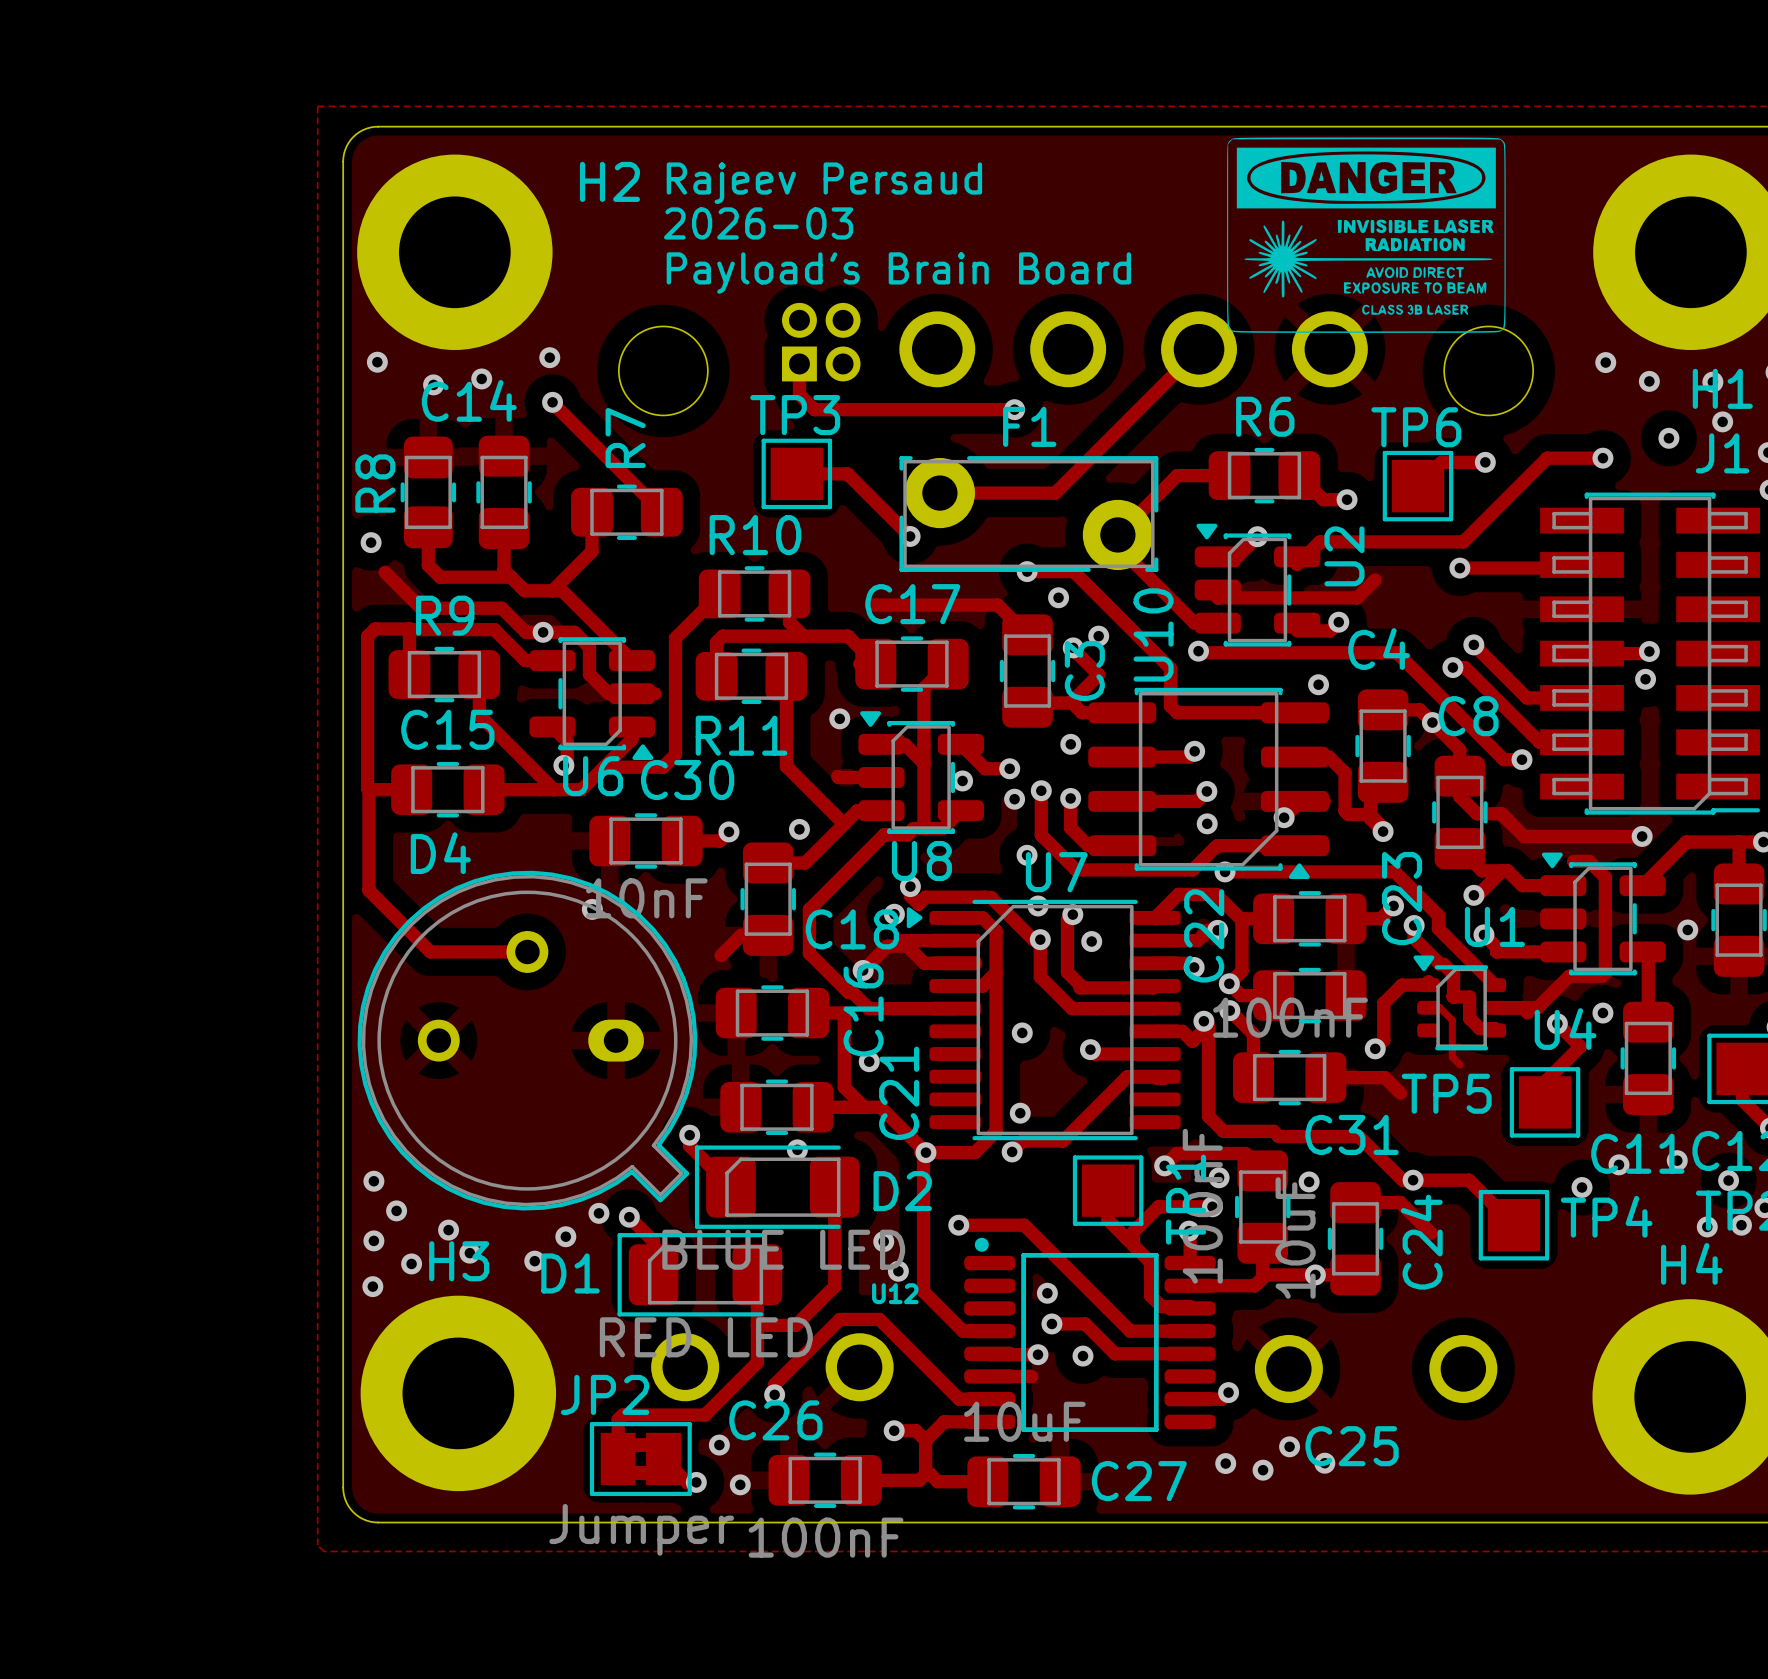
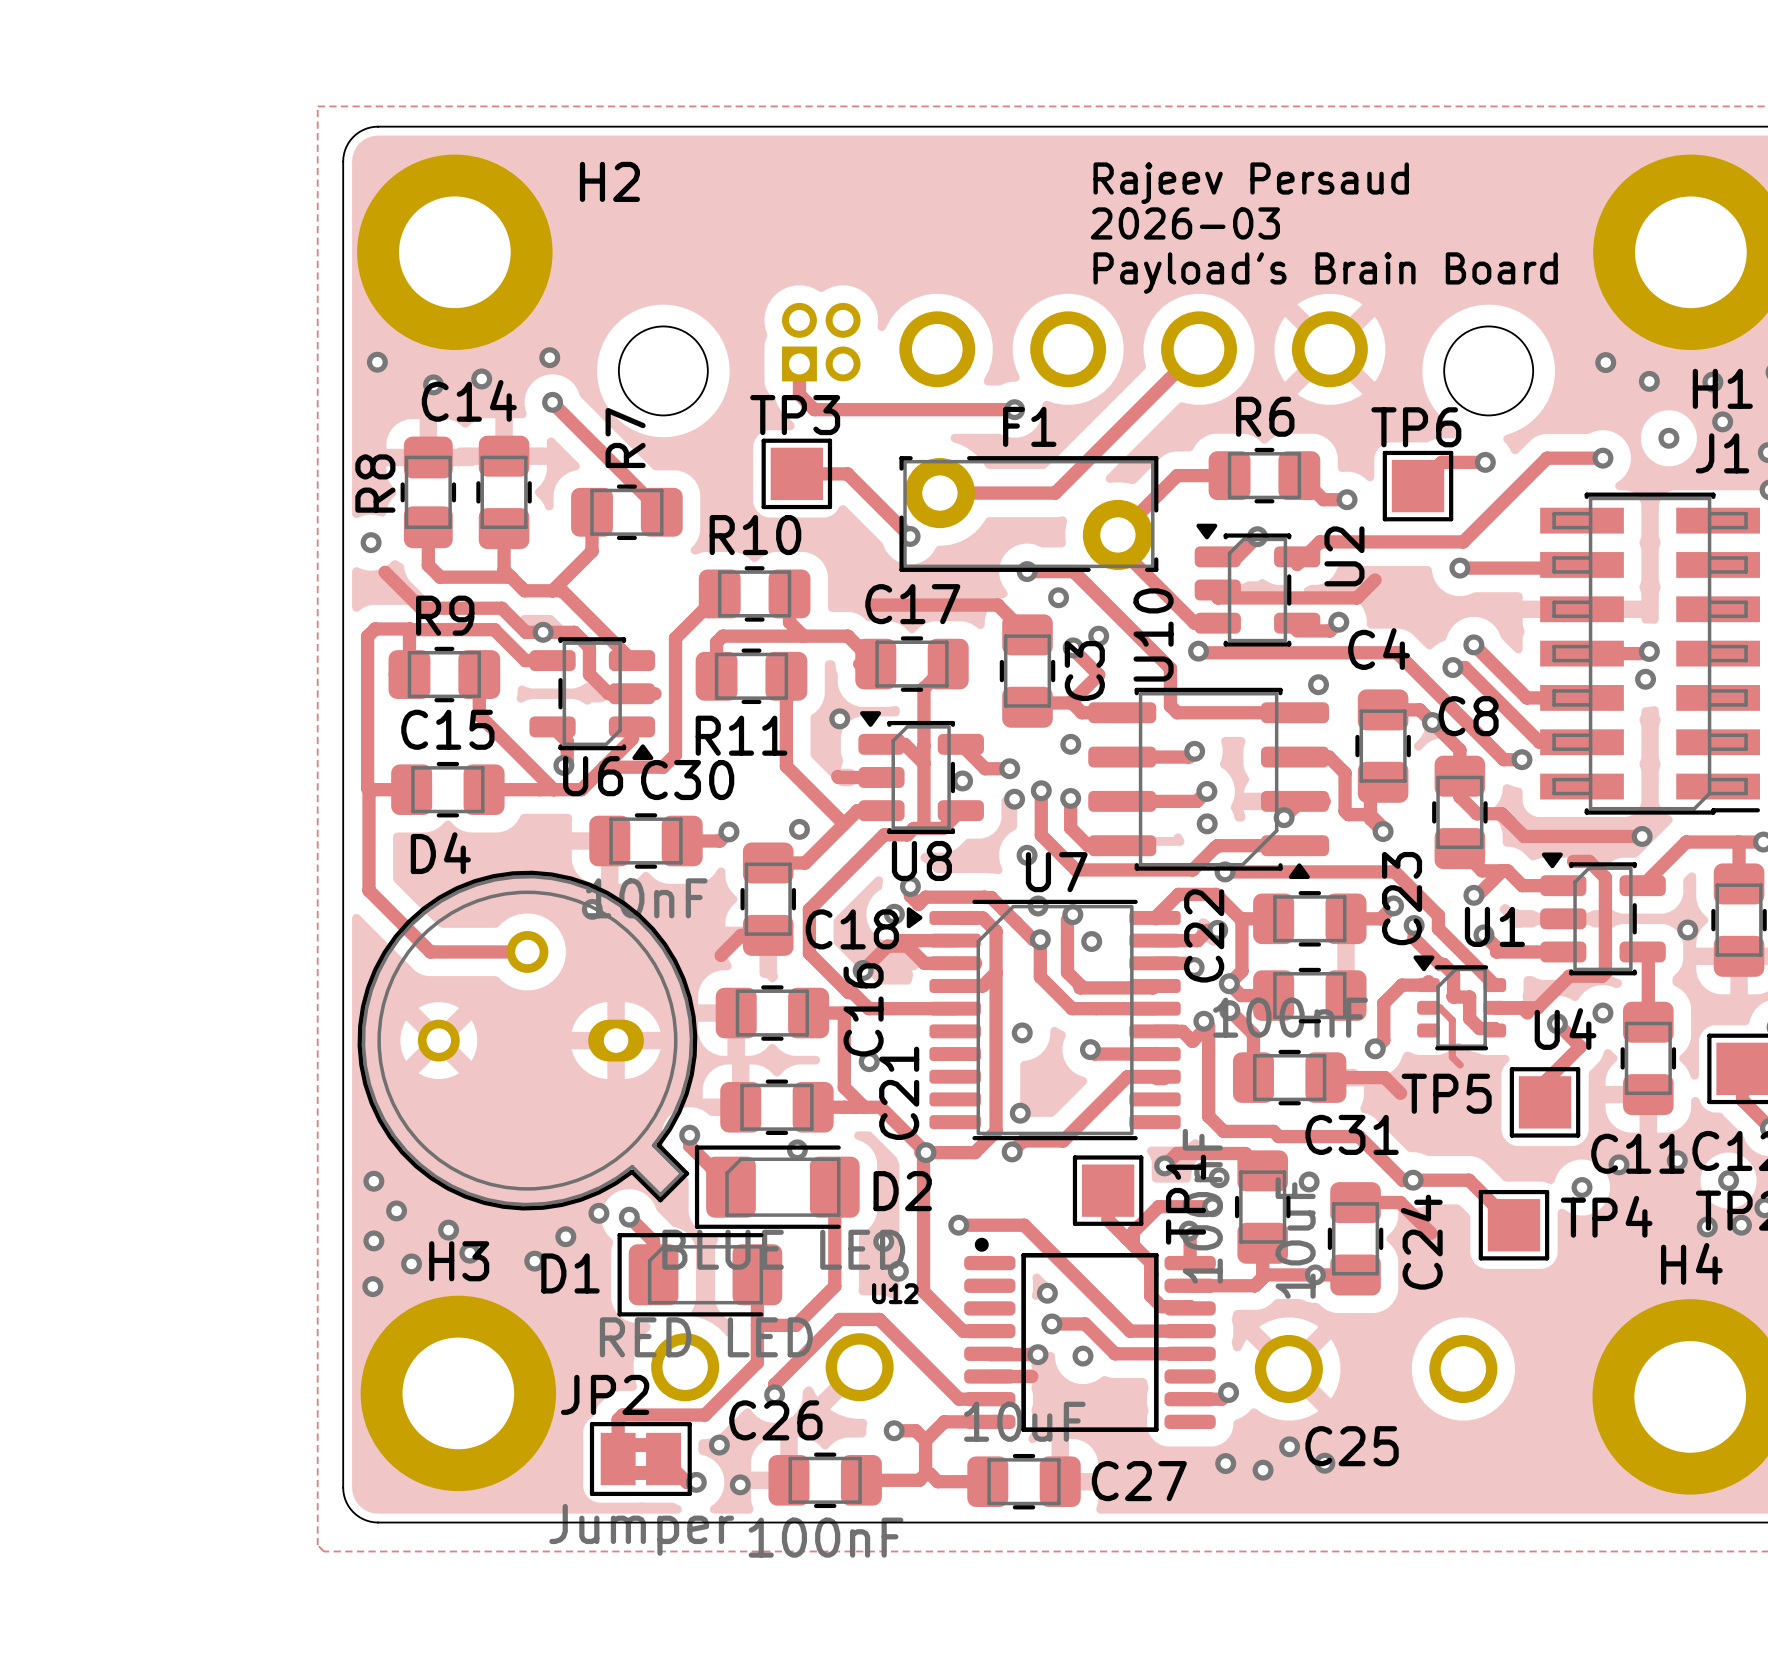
drawing: [1227, 137, 1506, 333] -> none
text position: Rajeev Persaud (824, 183) -> Rajeev Persaud (1251, 183)
text position: 2026-03 (758, 223) -> 2026-03 (1185, 223)
text position: Payload's Brain Board (898, 273) -> Payload's Brain Board (1325, 273)

